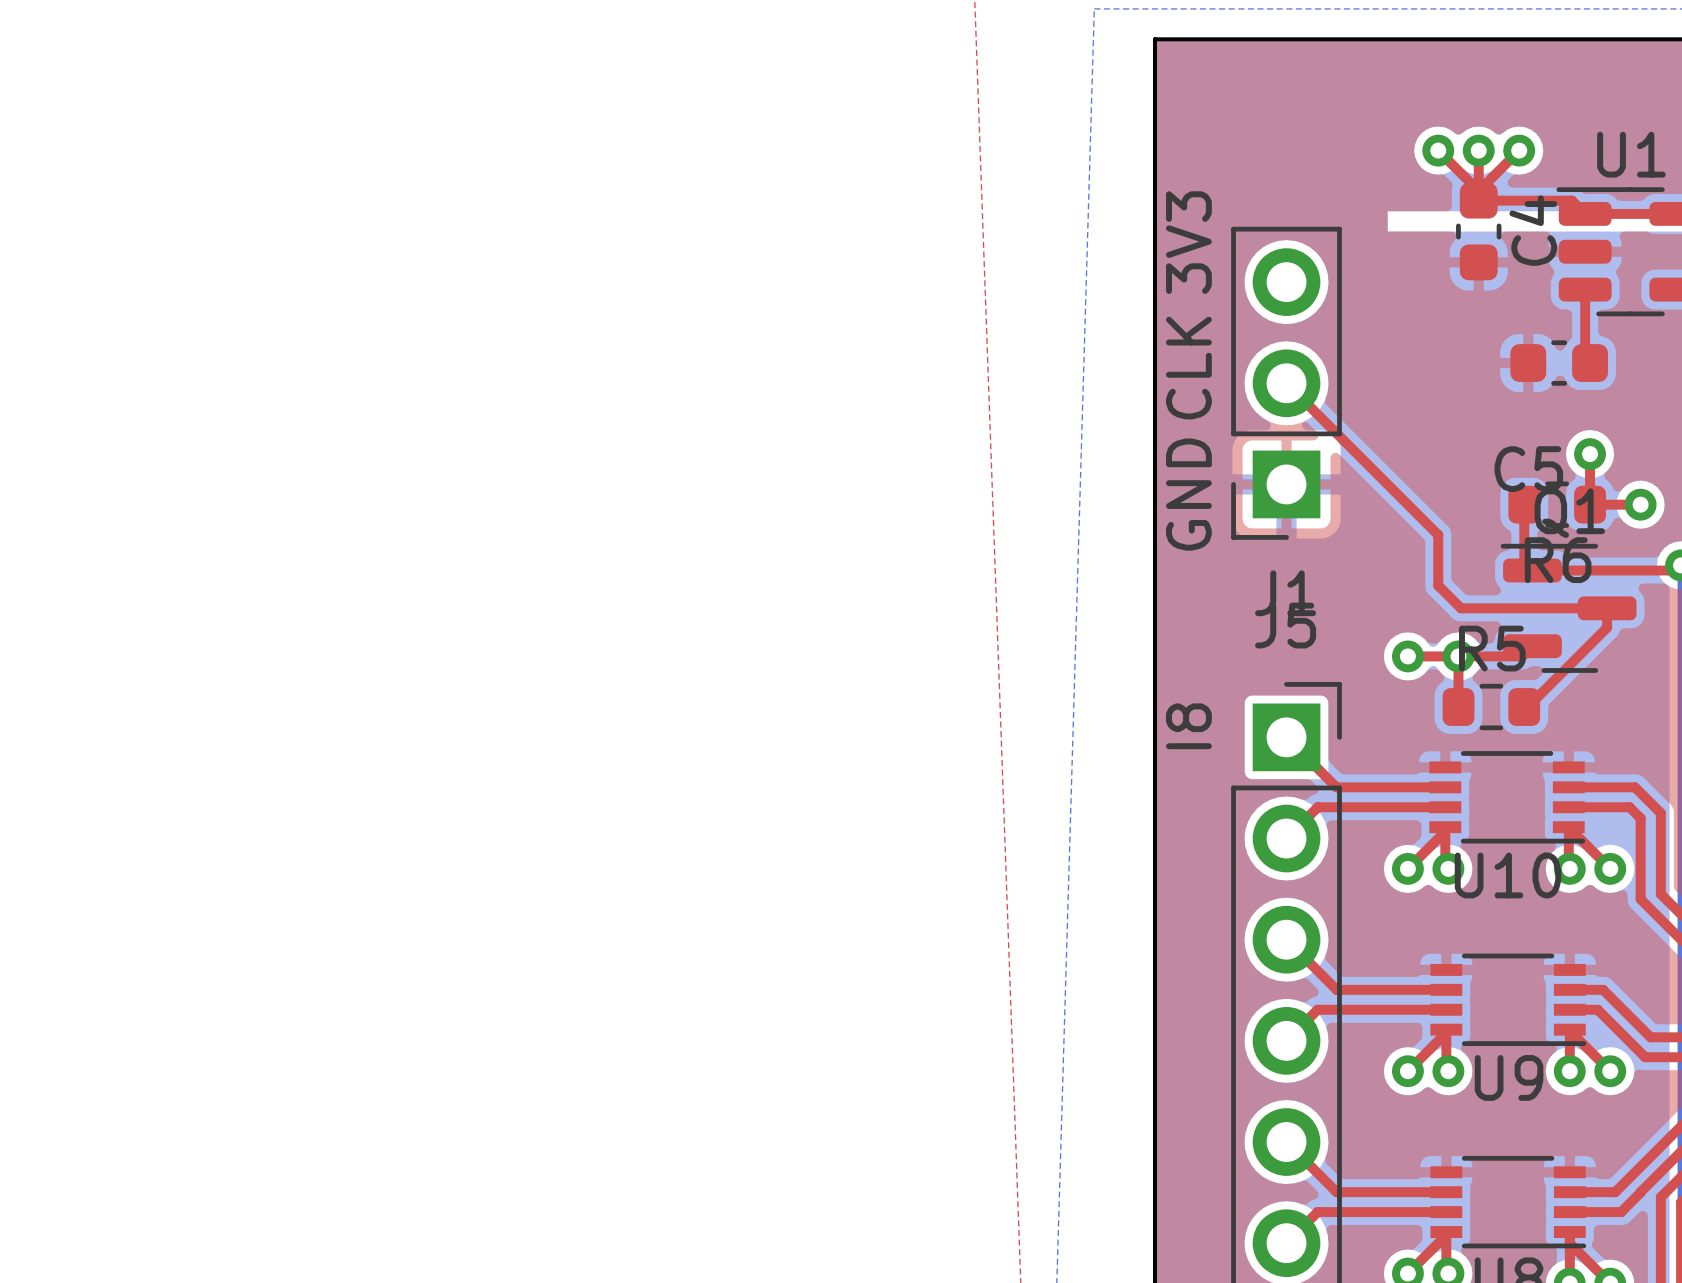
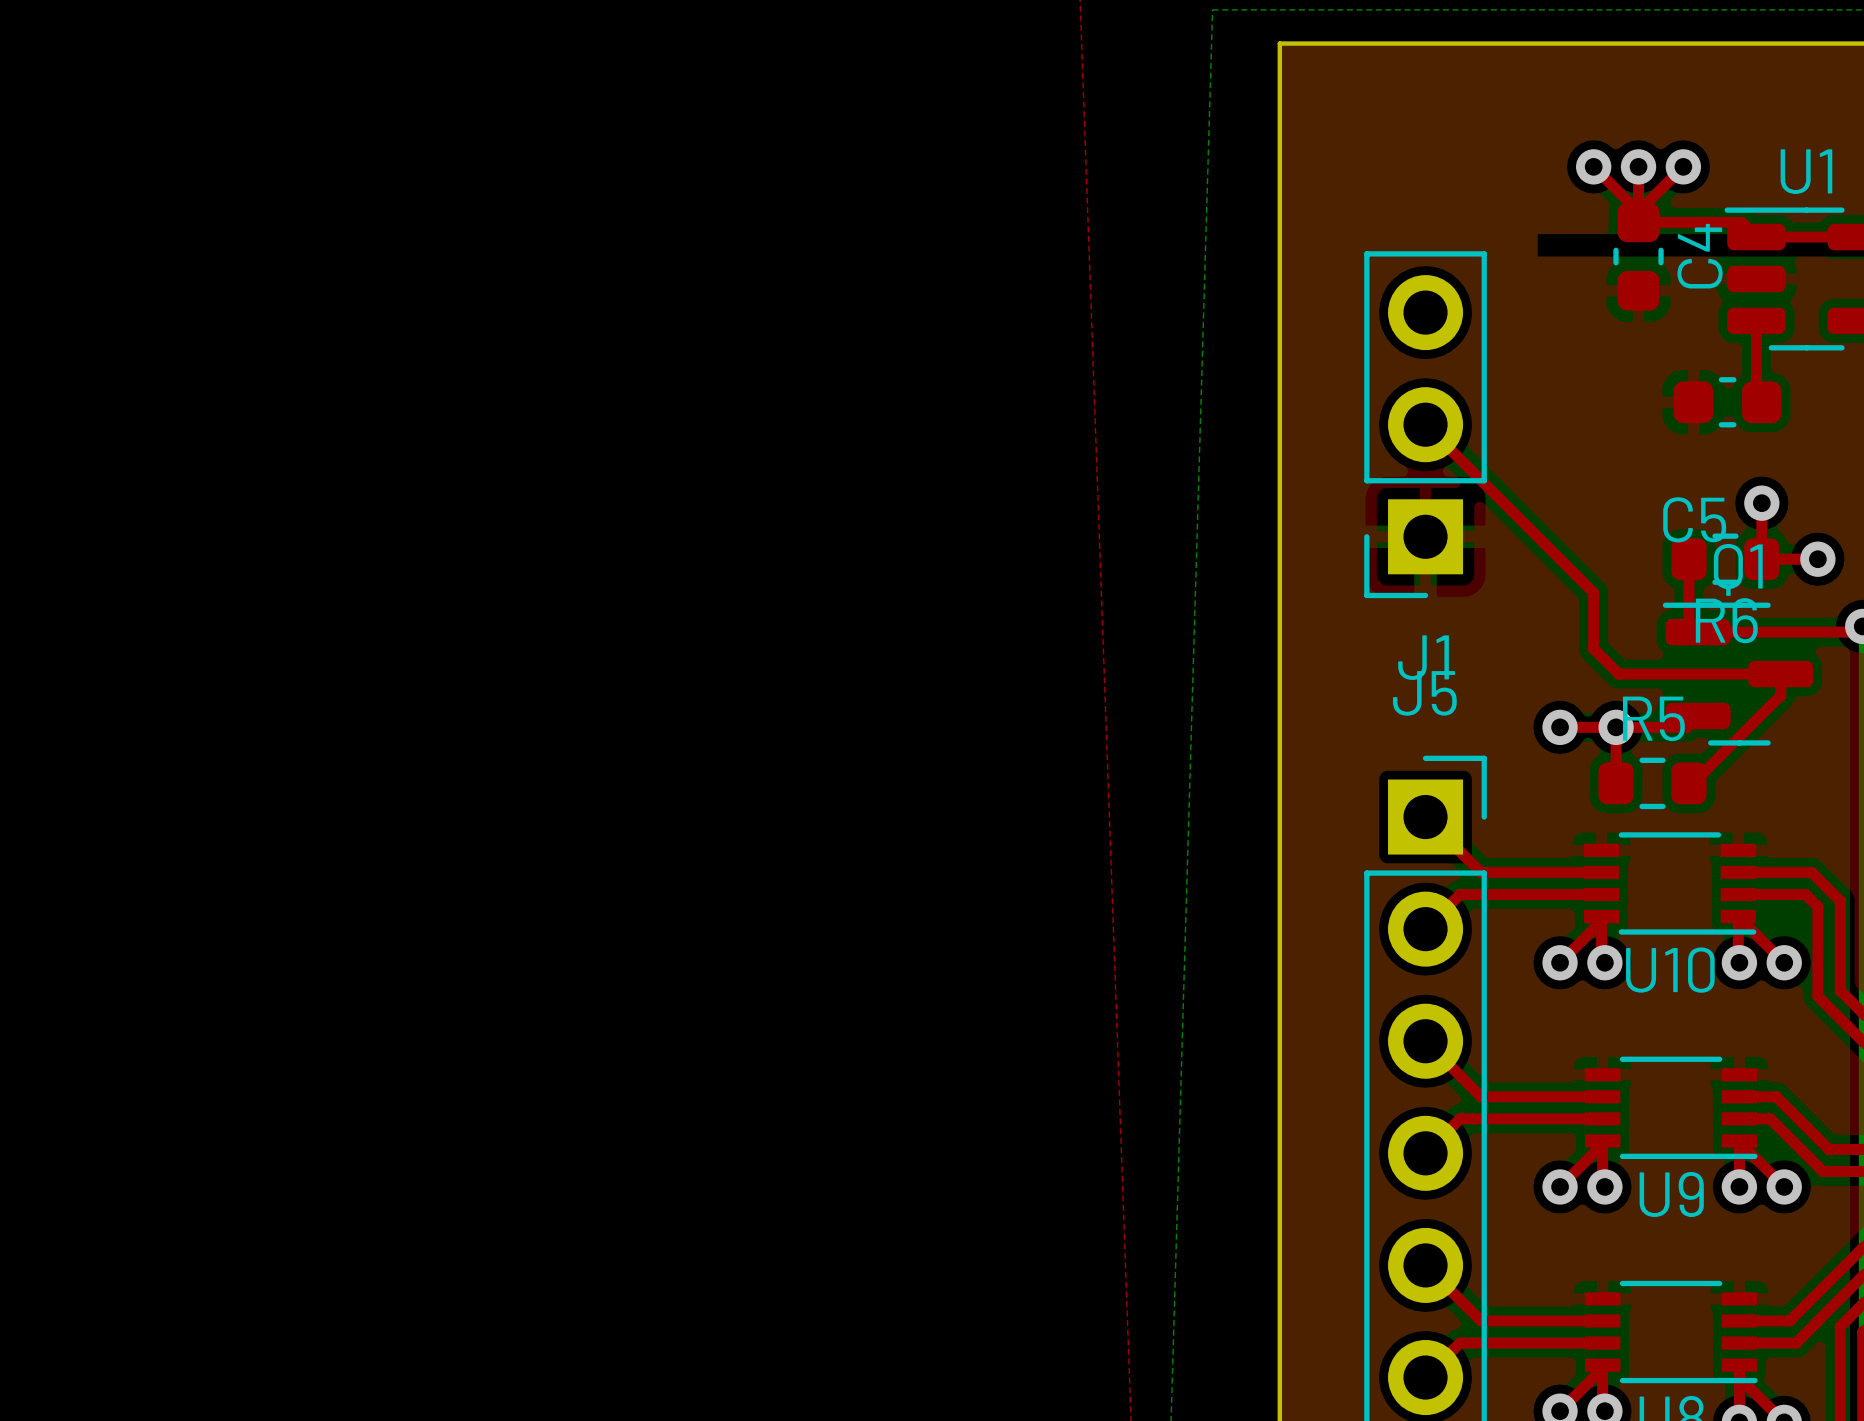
text: 3V3 (1188, 242) -> none
text: CLK (1188, 368) -> none
text: GND (1188, 494) -> none
text: I8 (1188, 726) -> none

